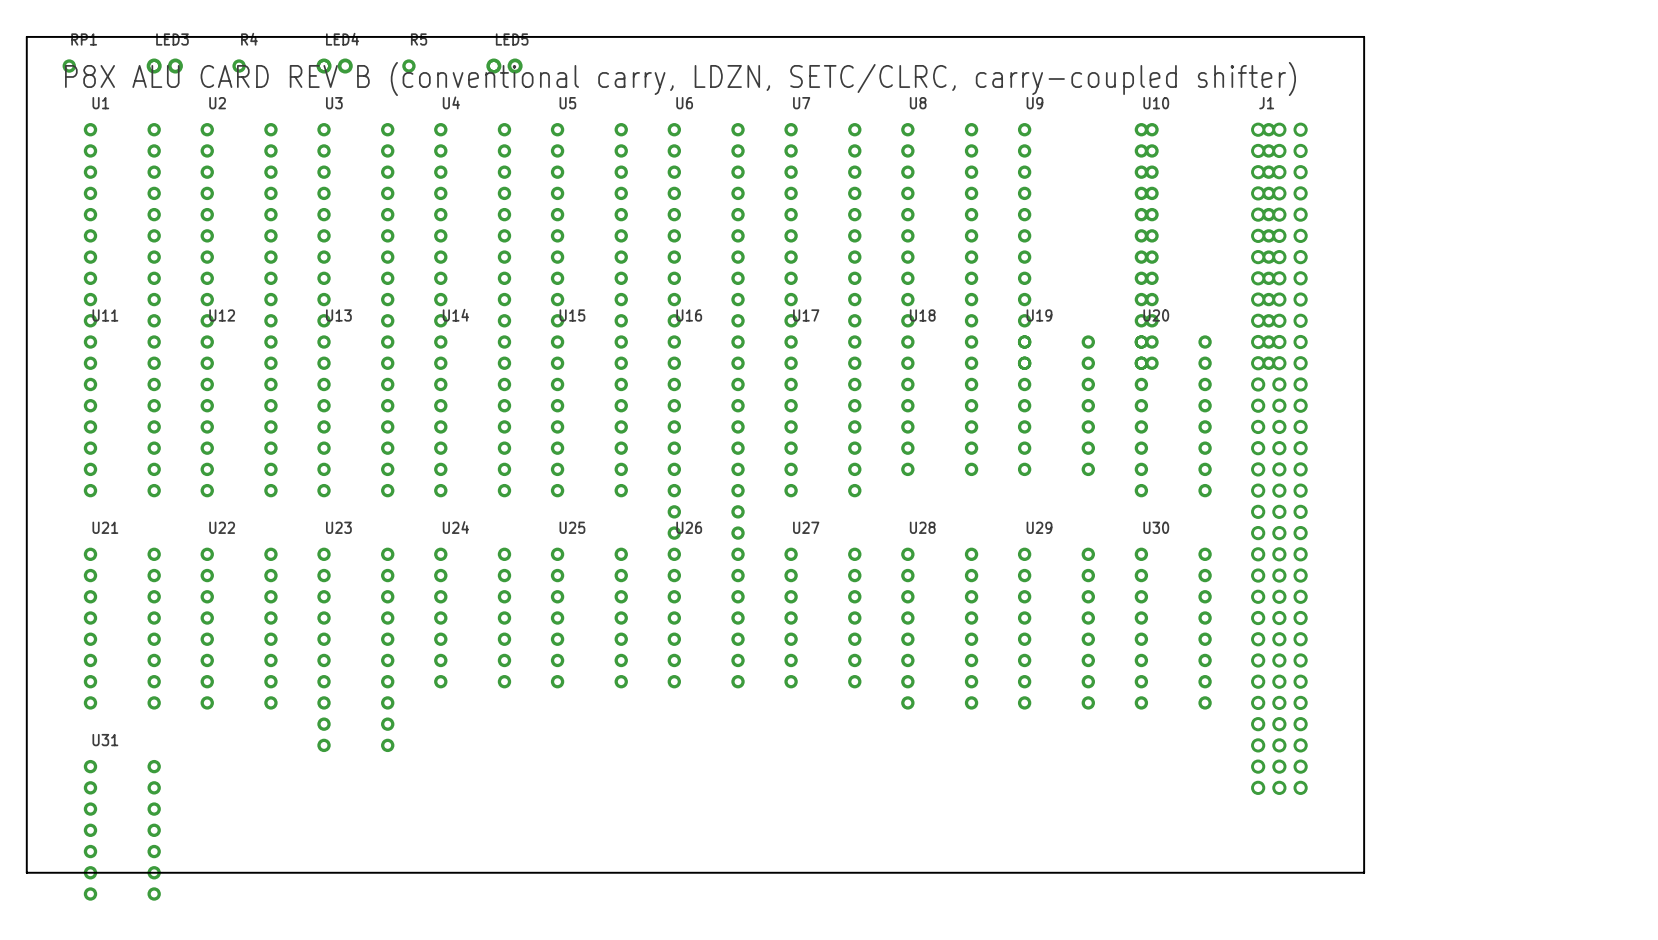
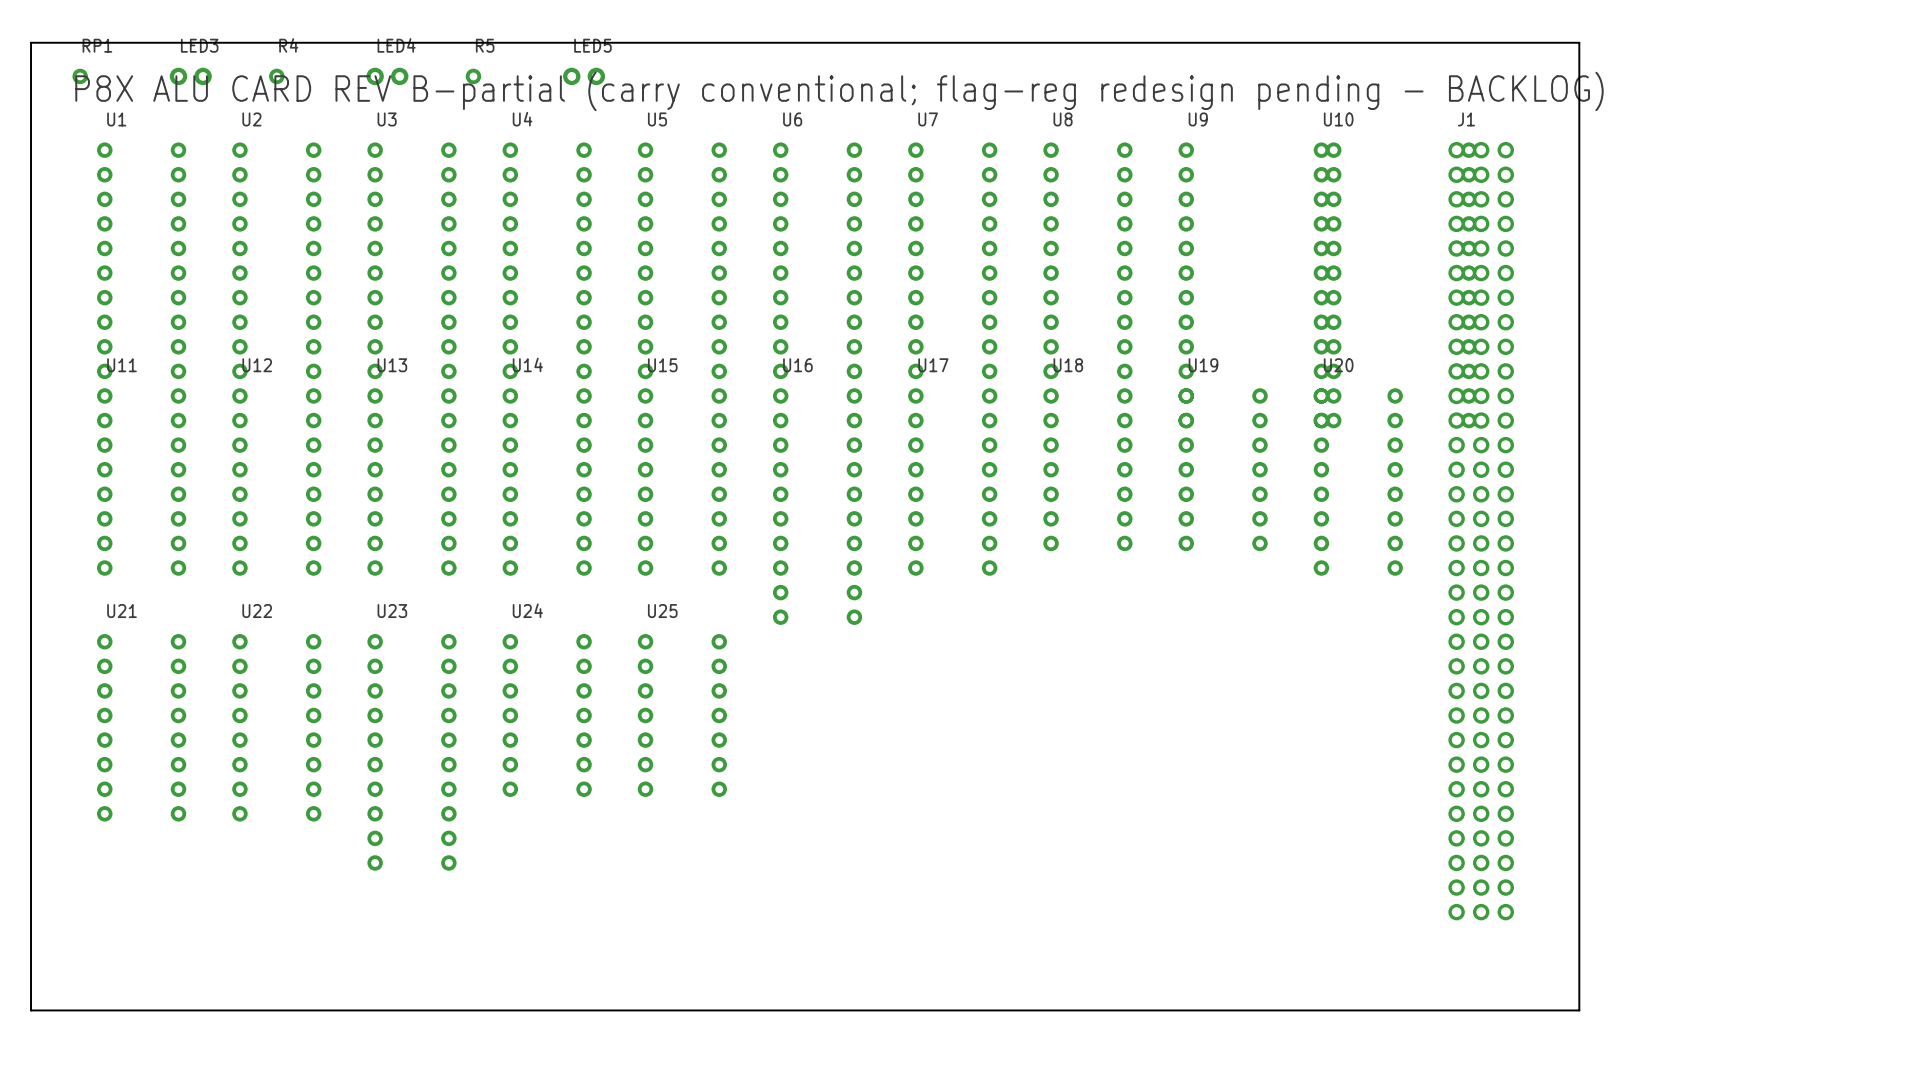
text: P8X ALU CARD REV B (conventional carry, LDZN, SETC/CLRC, carry-coupled shifter) (680, 79) -> P8X ALU CARD REV B-partial (carry conventional; flag-reg redesign pending - BACKLOG) (839, 91)
U26: (706, 618) -> none
U27: (822, 618) -> none
U28: (939, 628) -> none
U29: (1056, 628) -> none
U30: (1173, 628) -> none
U31: (122, 830) -> none

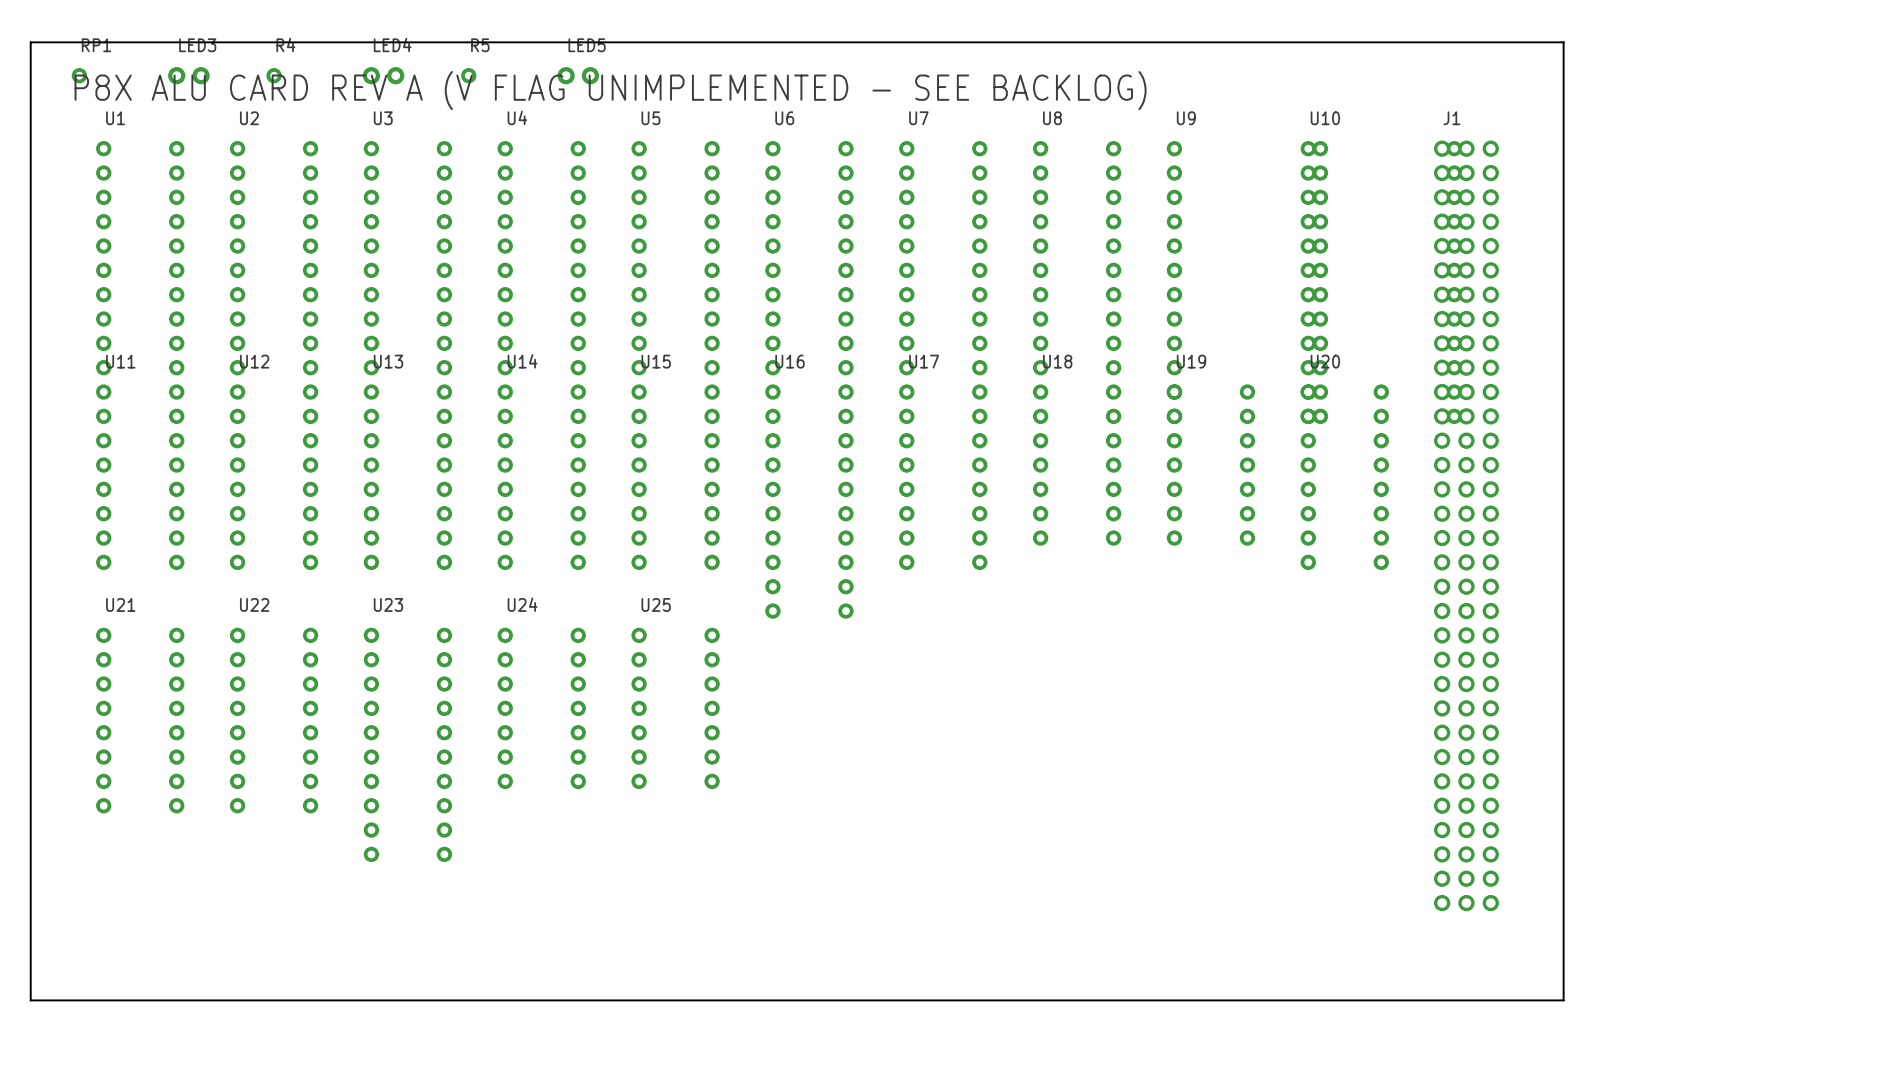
text: P8X ALU CARD REV B-partial (carry conventional; flag-reg redesign pending - BACKLOG) (839, 91) -> P8X ALU CARD REV A (V FLAG UNIMPLEMENTED - SEE BACKLOG) (610, 90)

